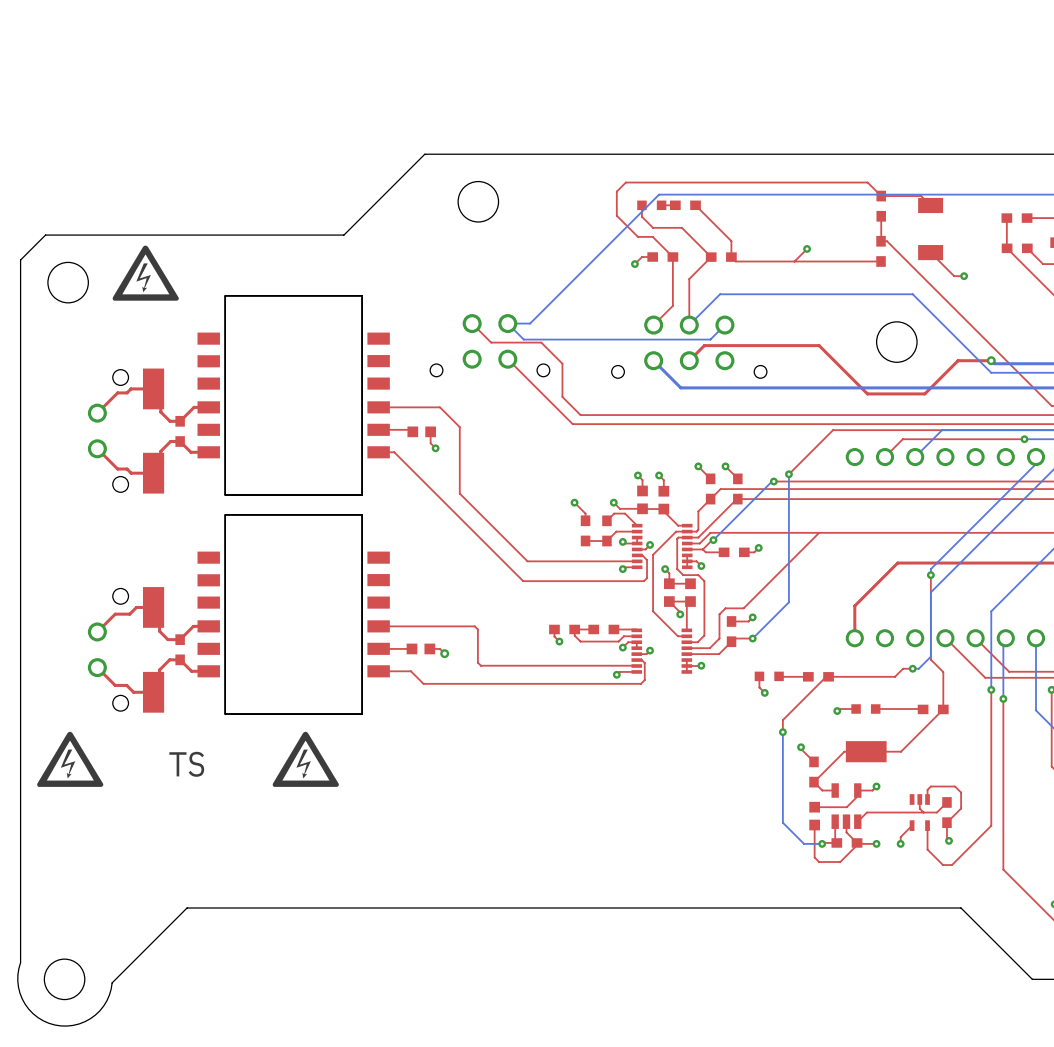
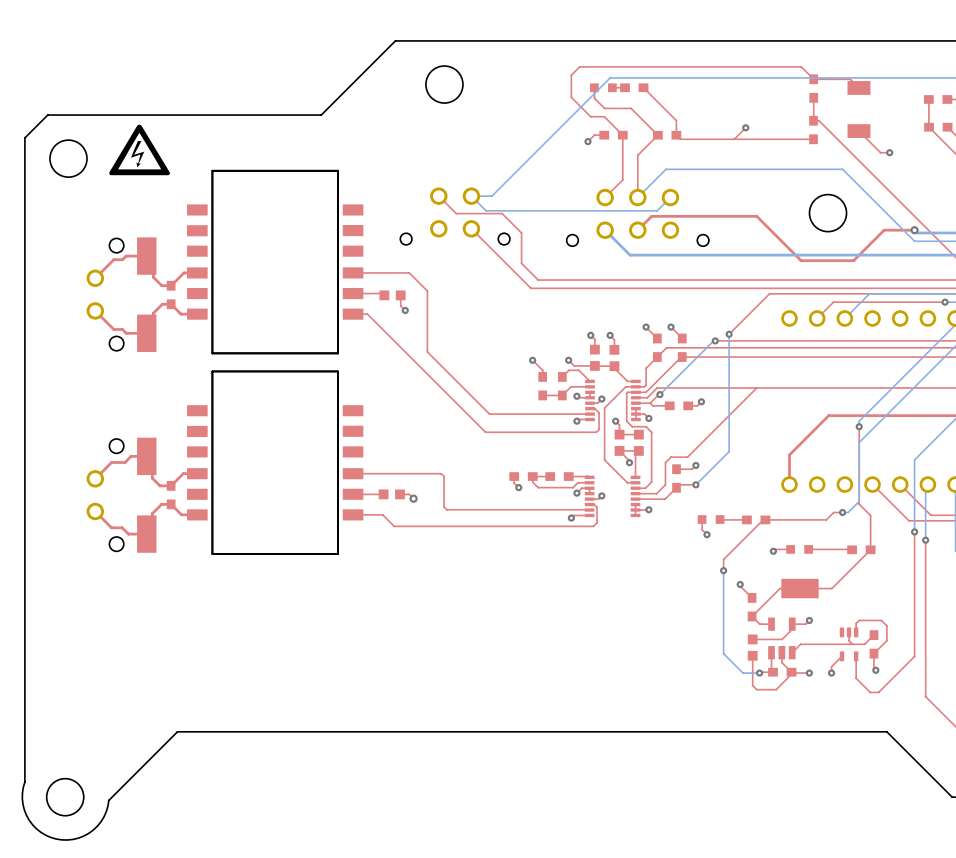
drawing: [37, 731, 104, 787] -> none
drawing: [272, 731, 339, 787] -> none
drawing: [169, 751, 205, 777] -> none

